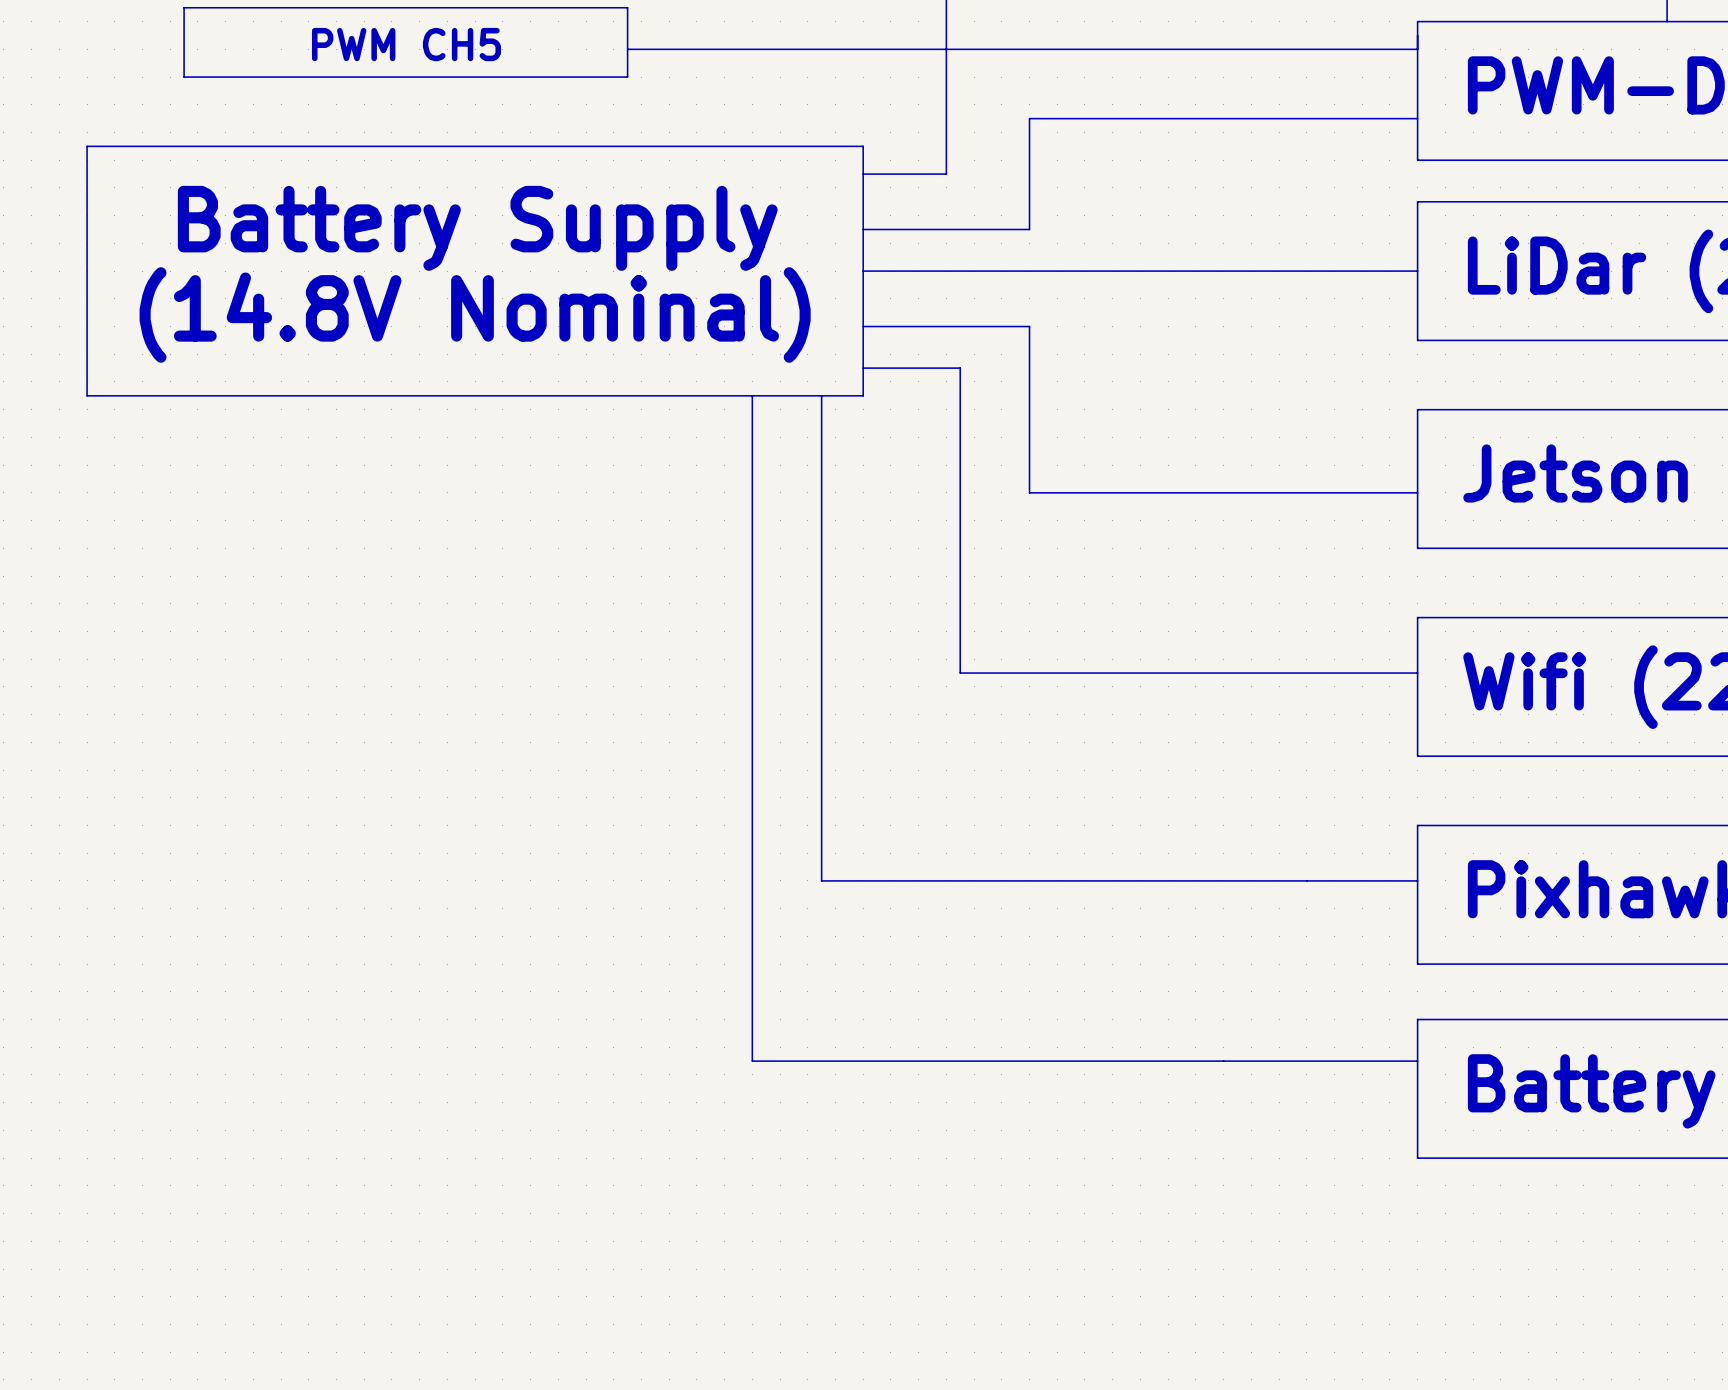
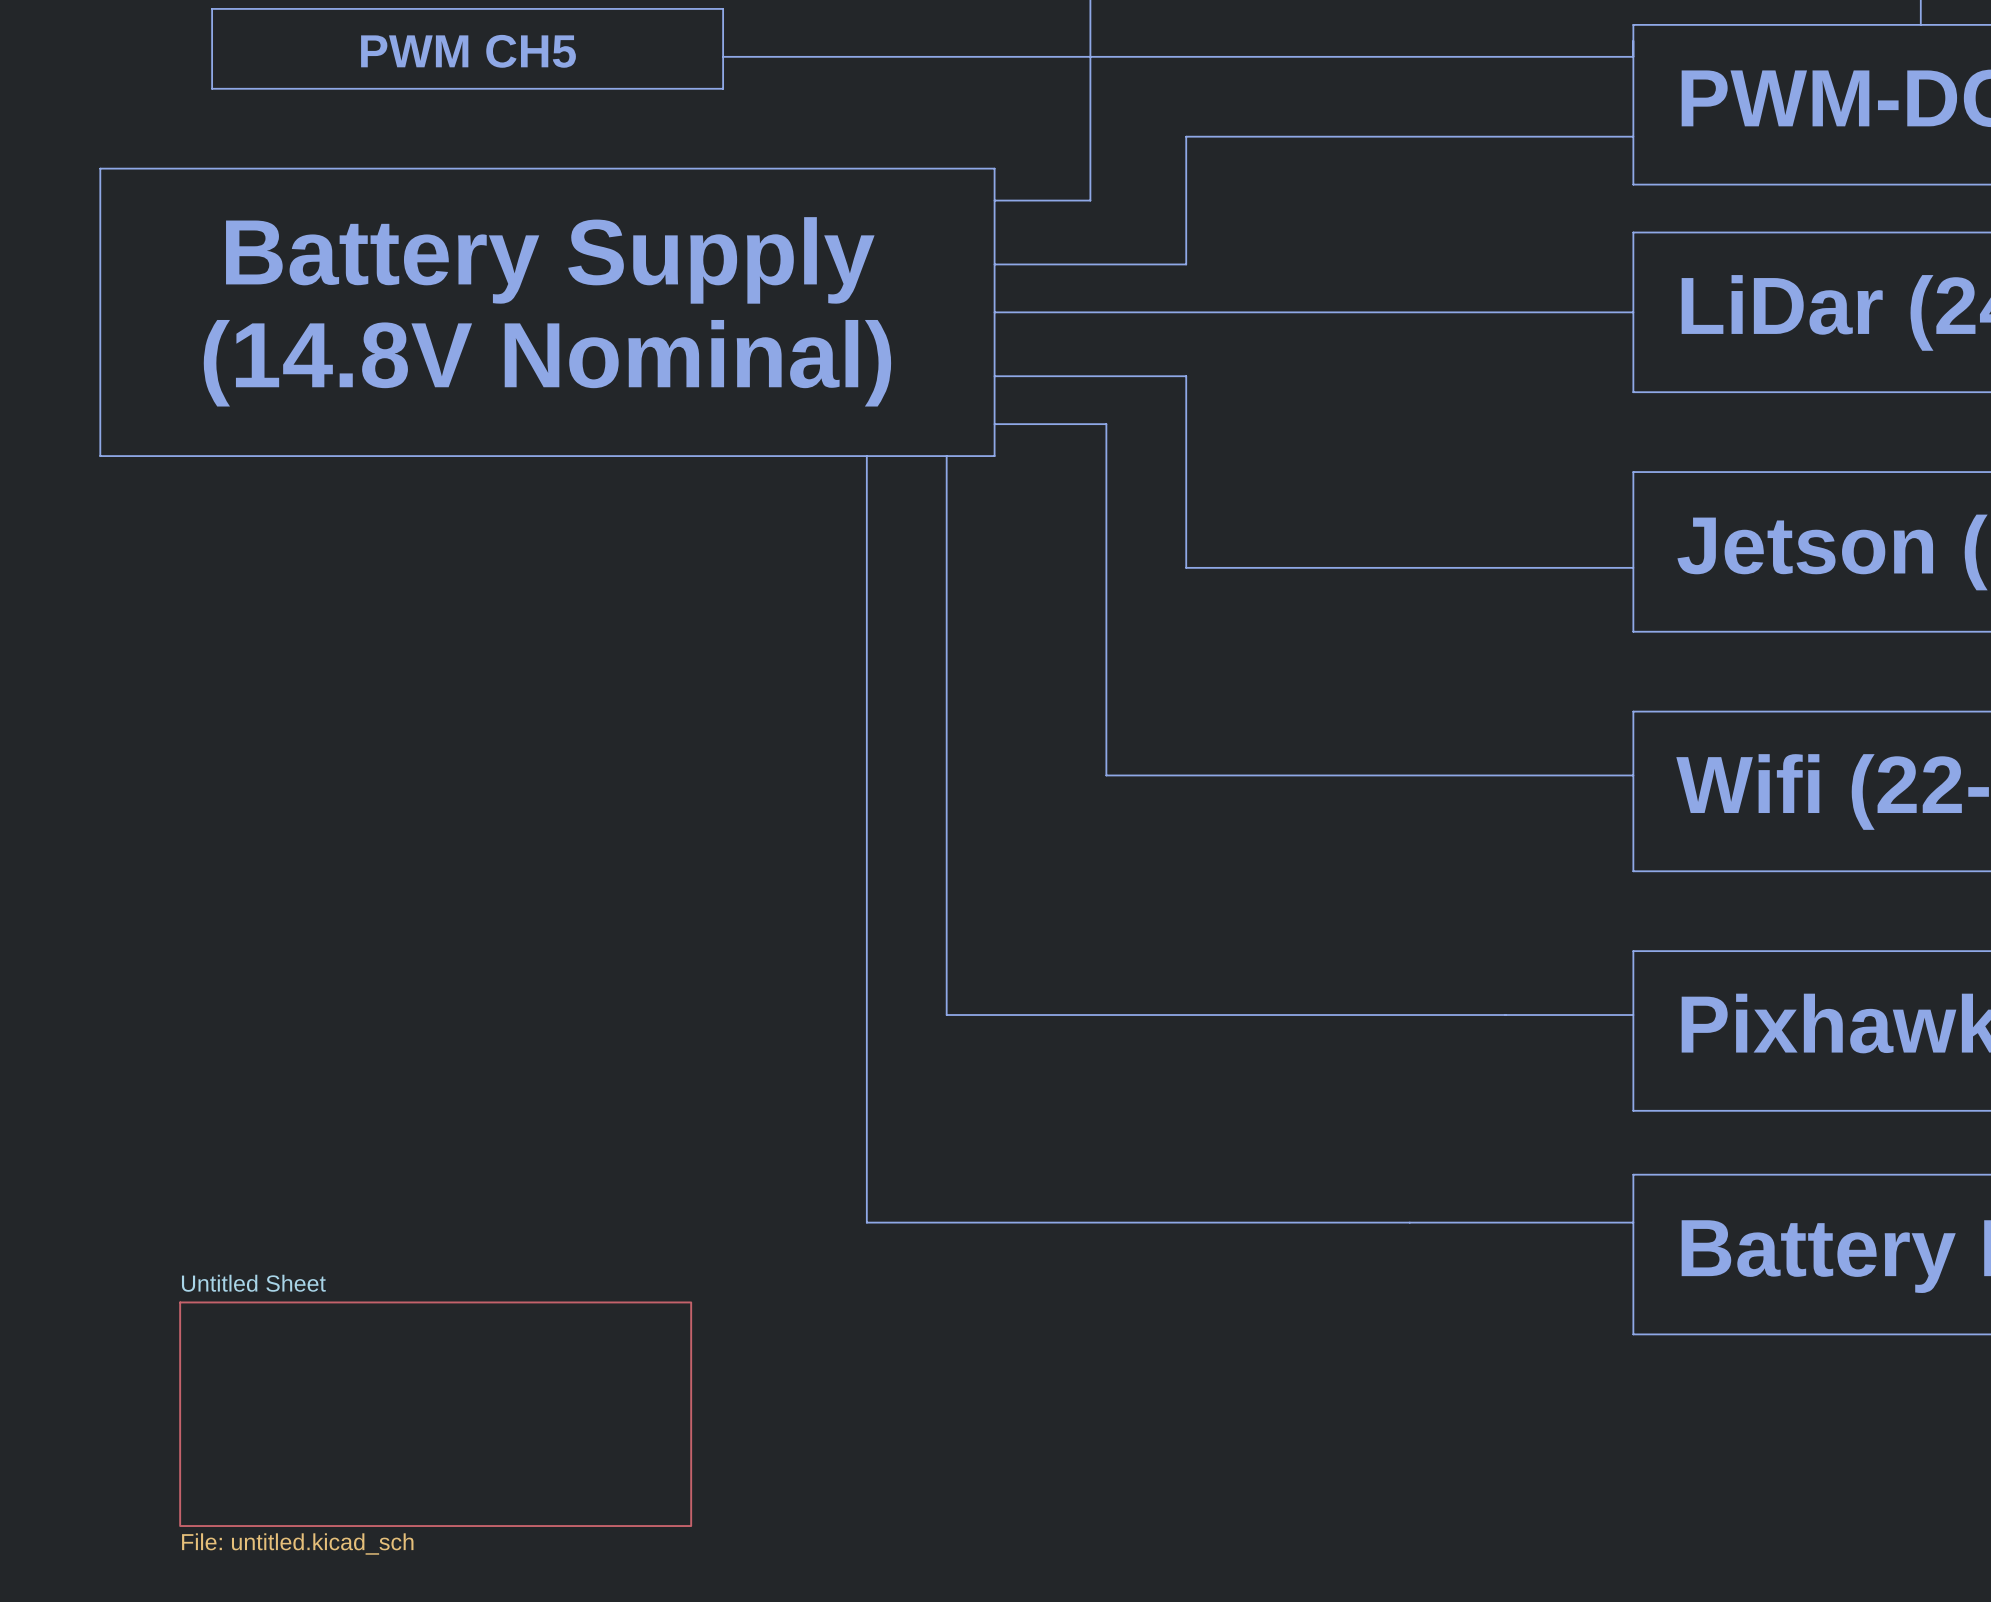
sheet Untitled Sheet: none -> File: untitled.kicad_sch (435, 1414)

